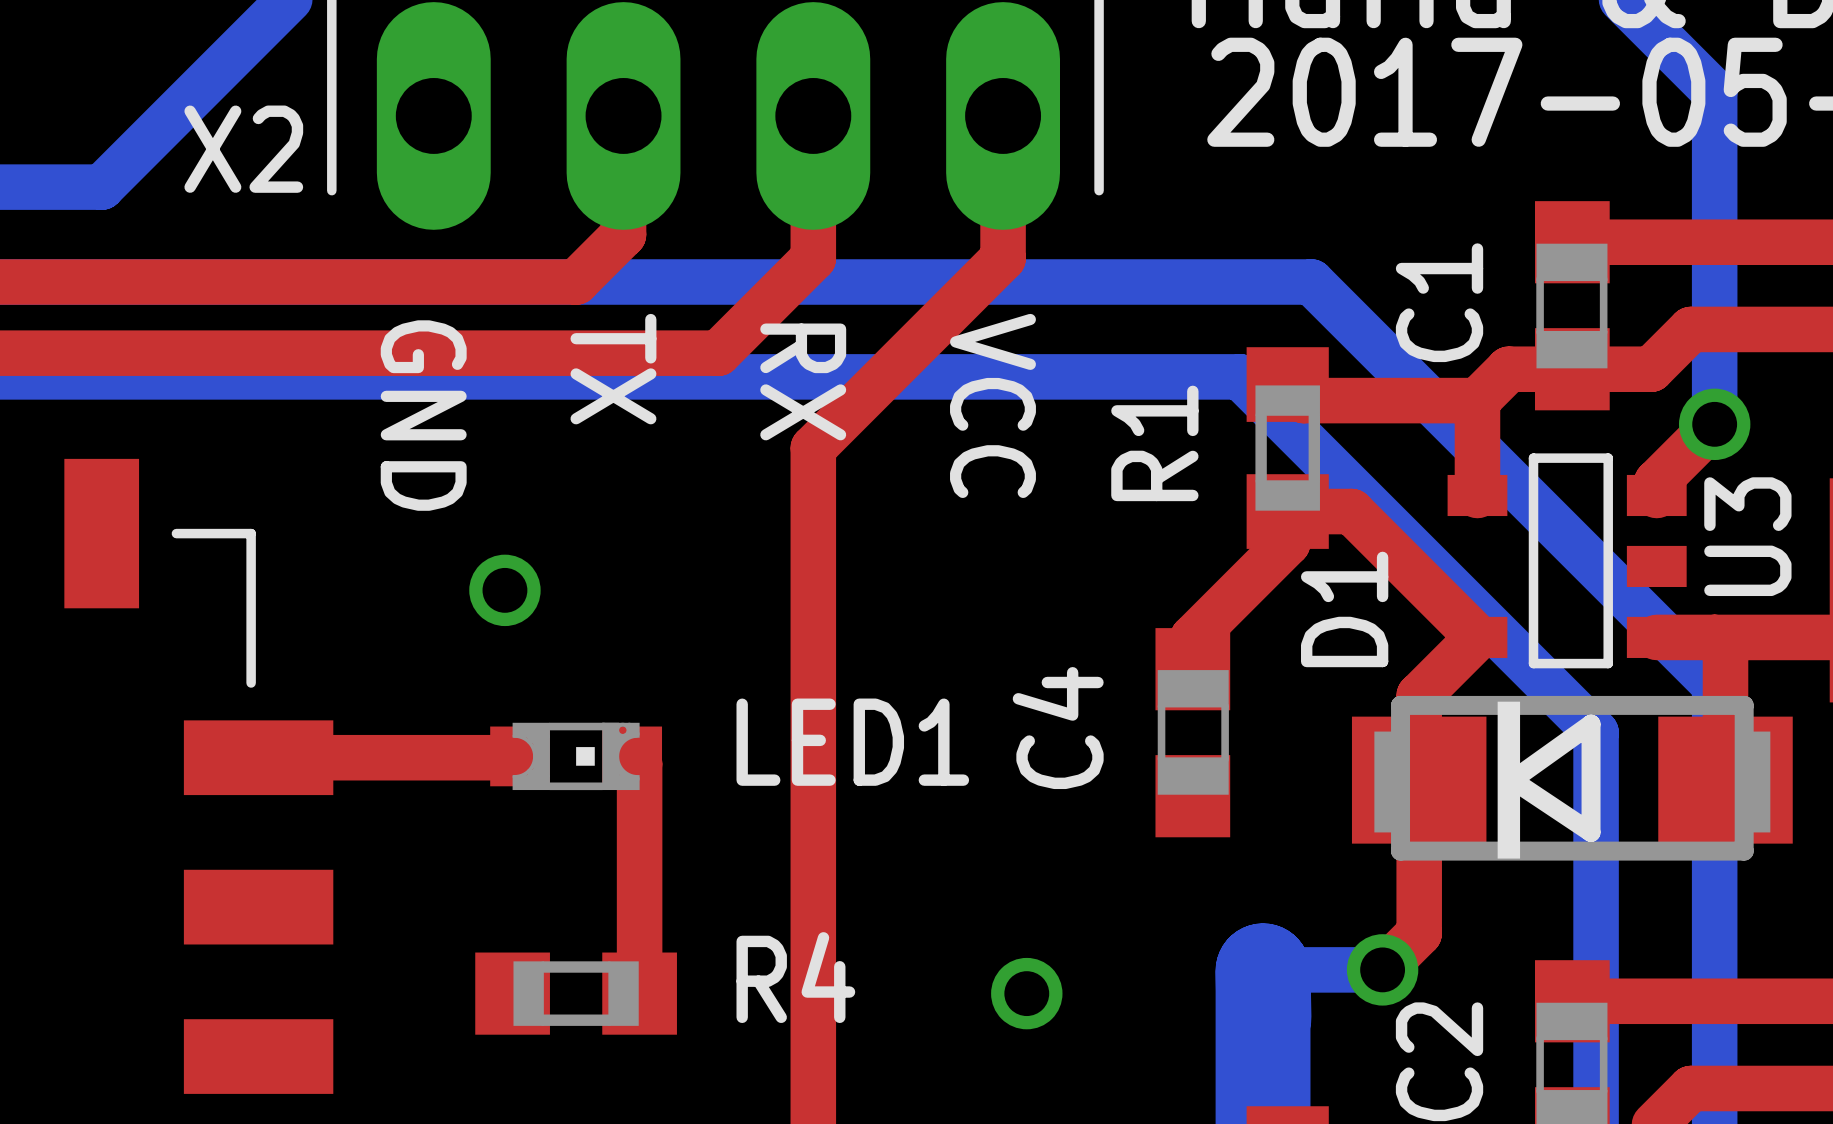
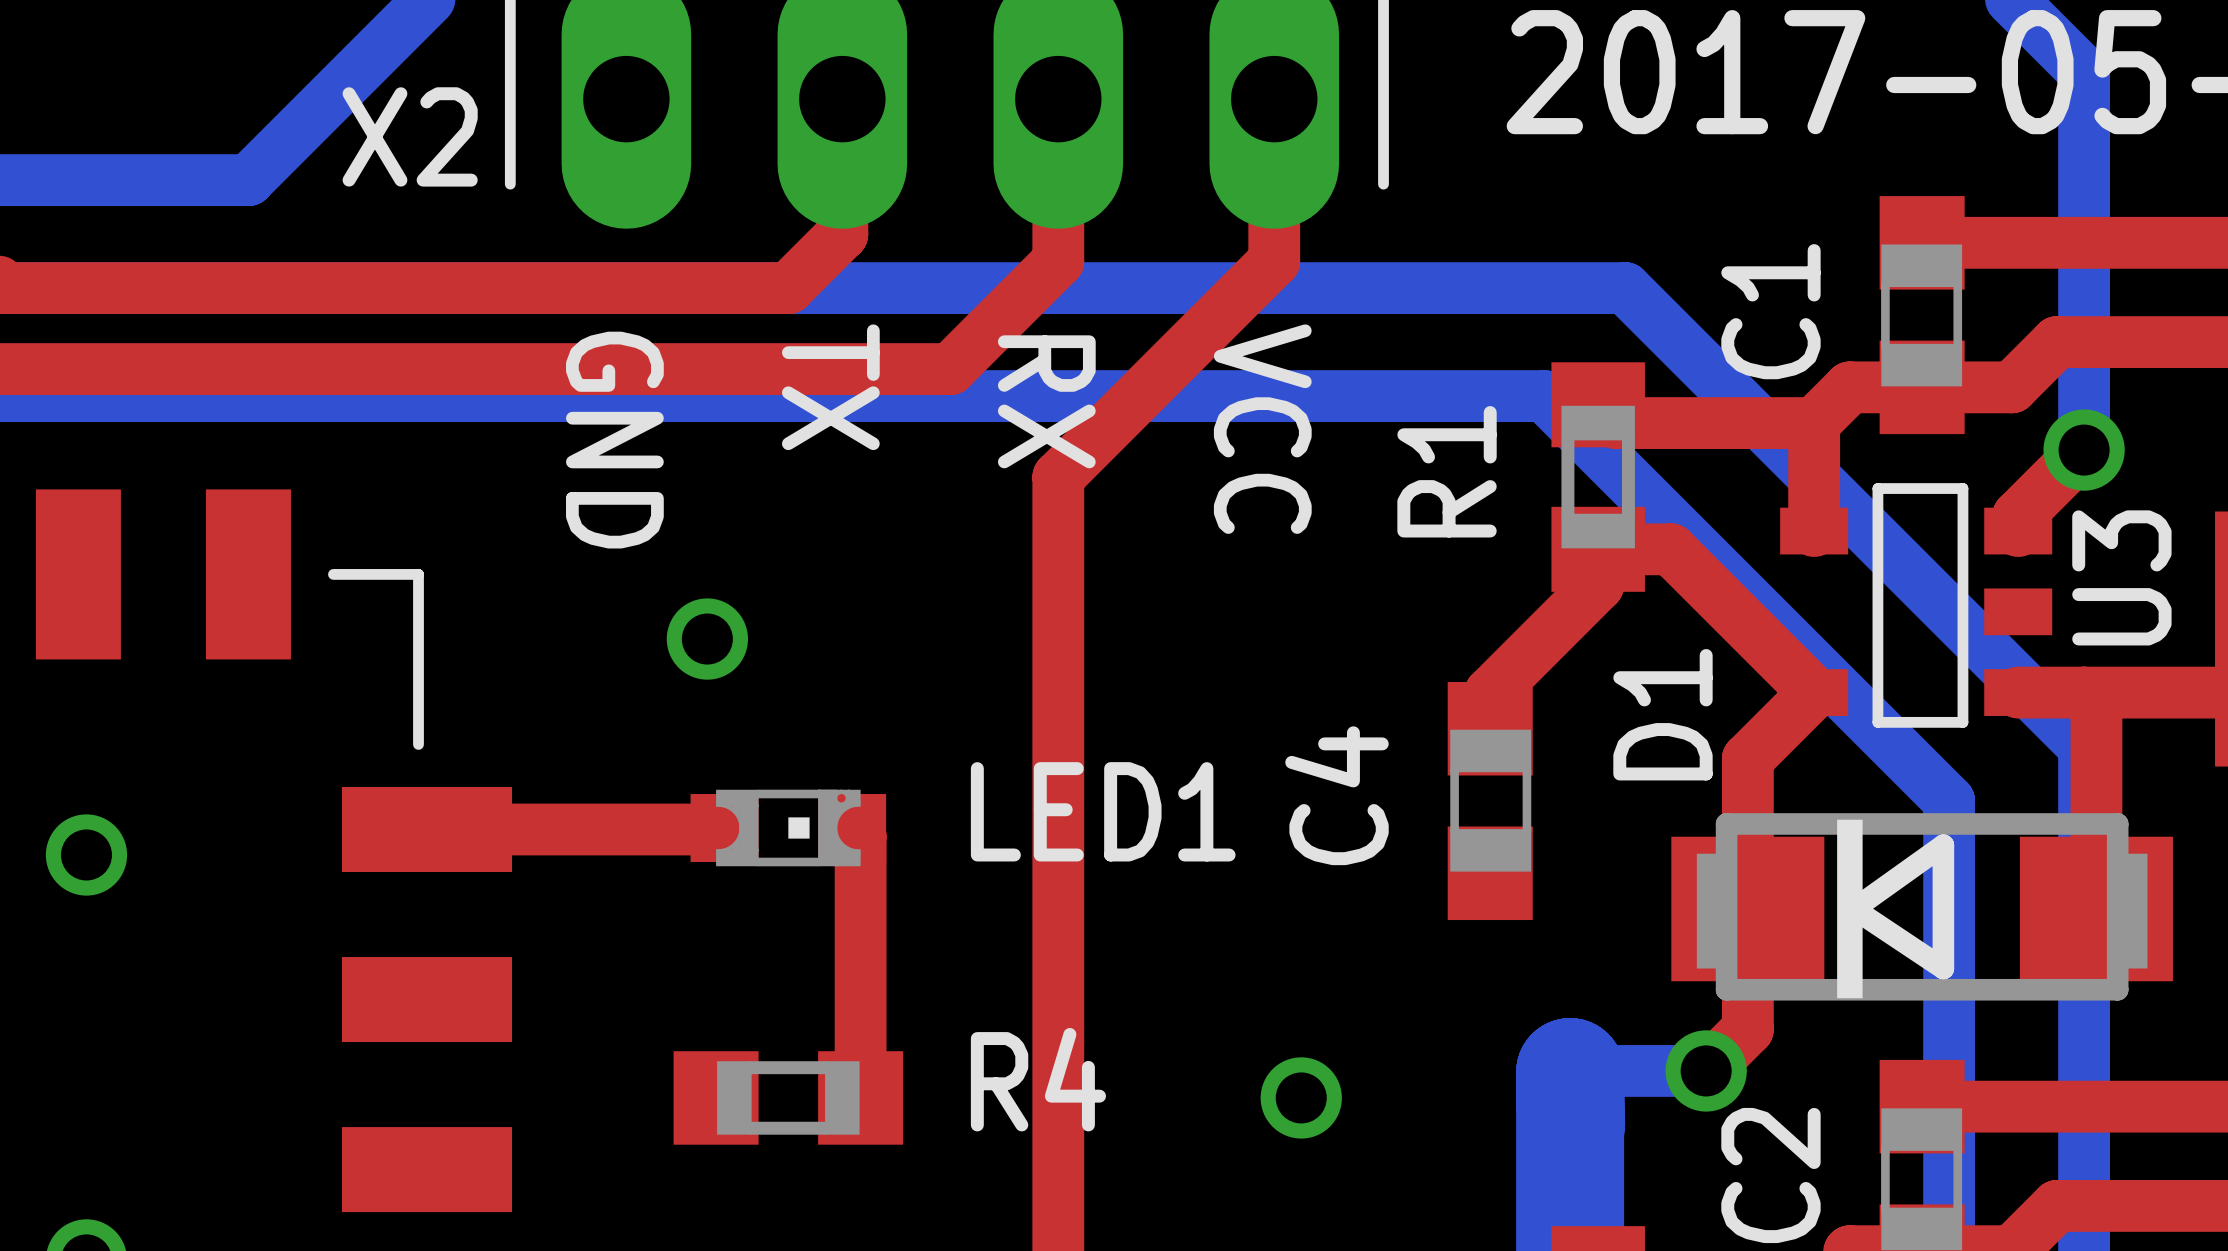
D1 position: (1572, 778) -> (1922, 906)

